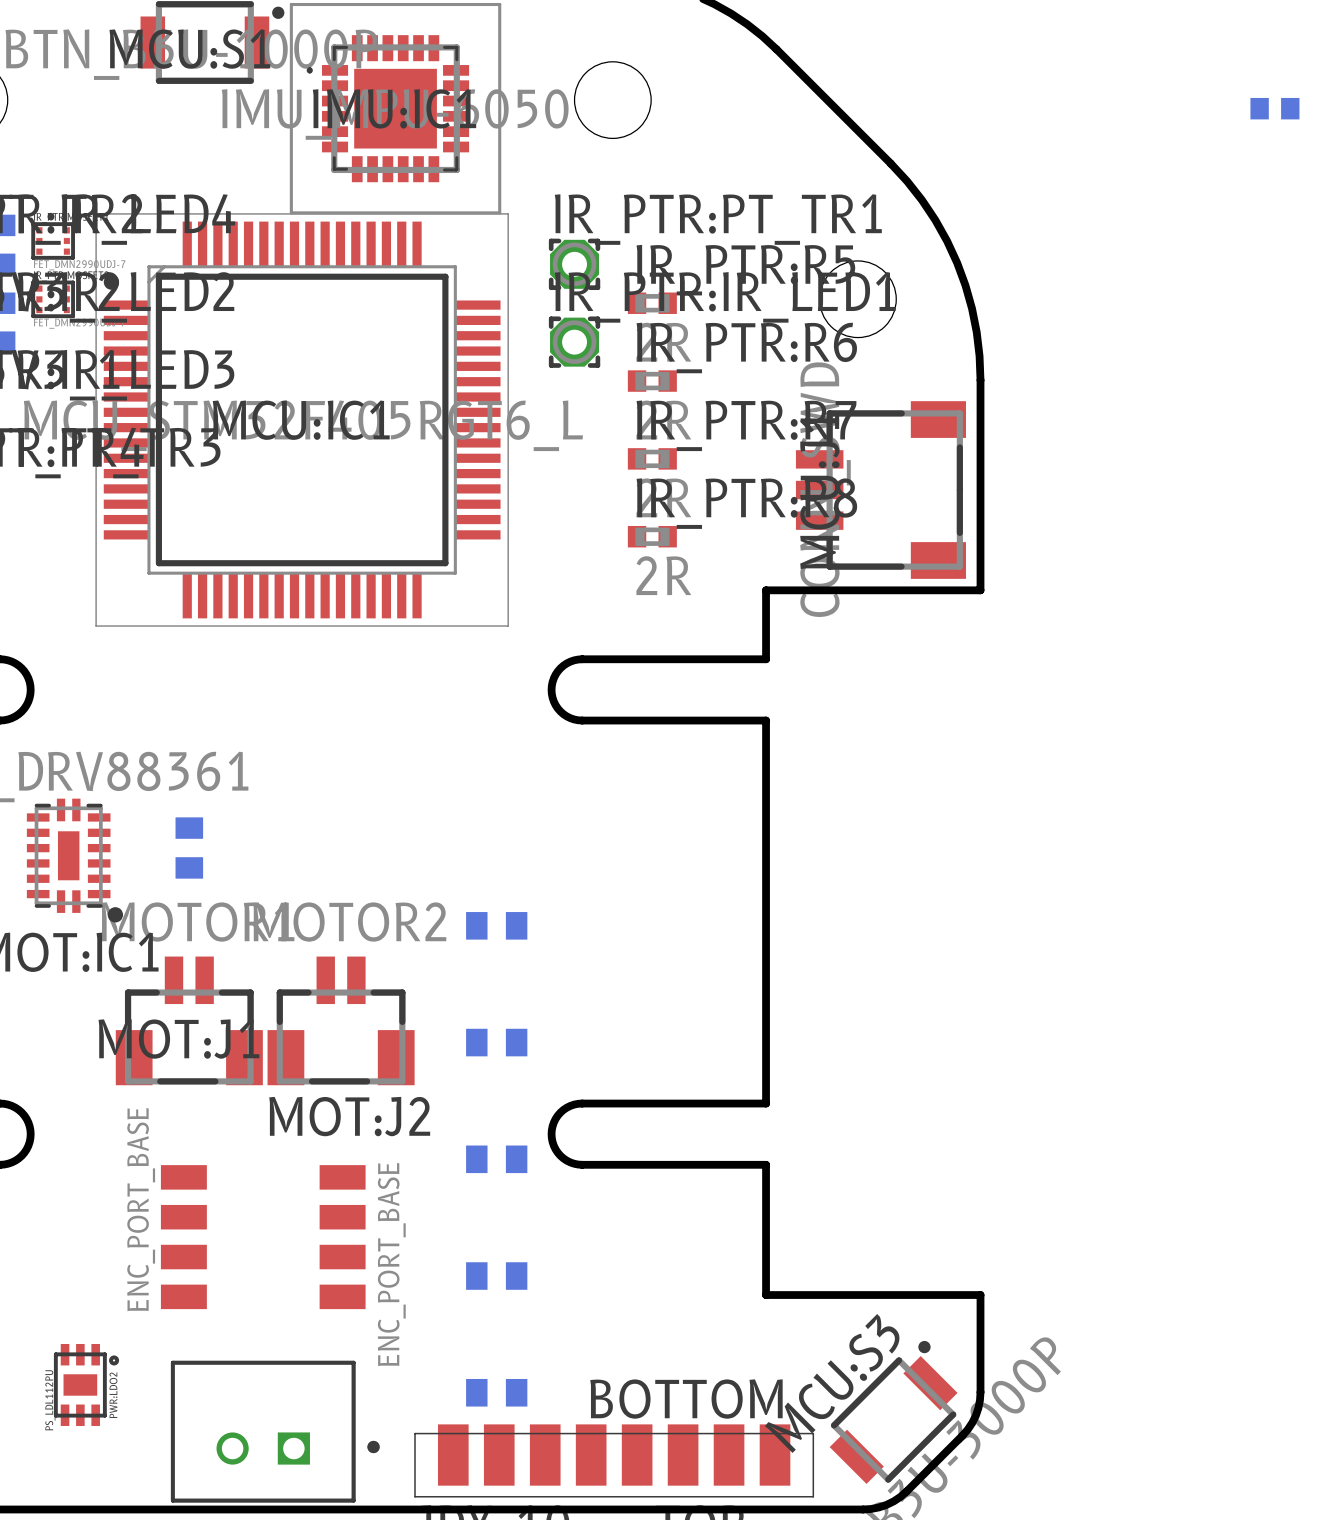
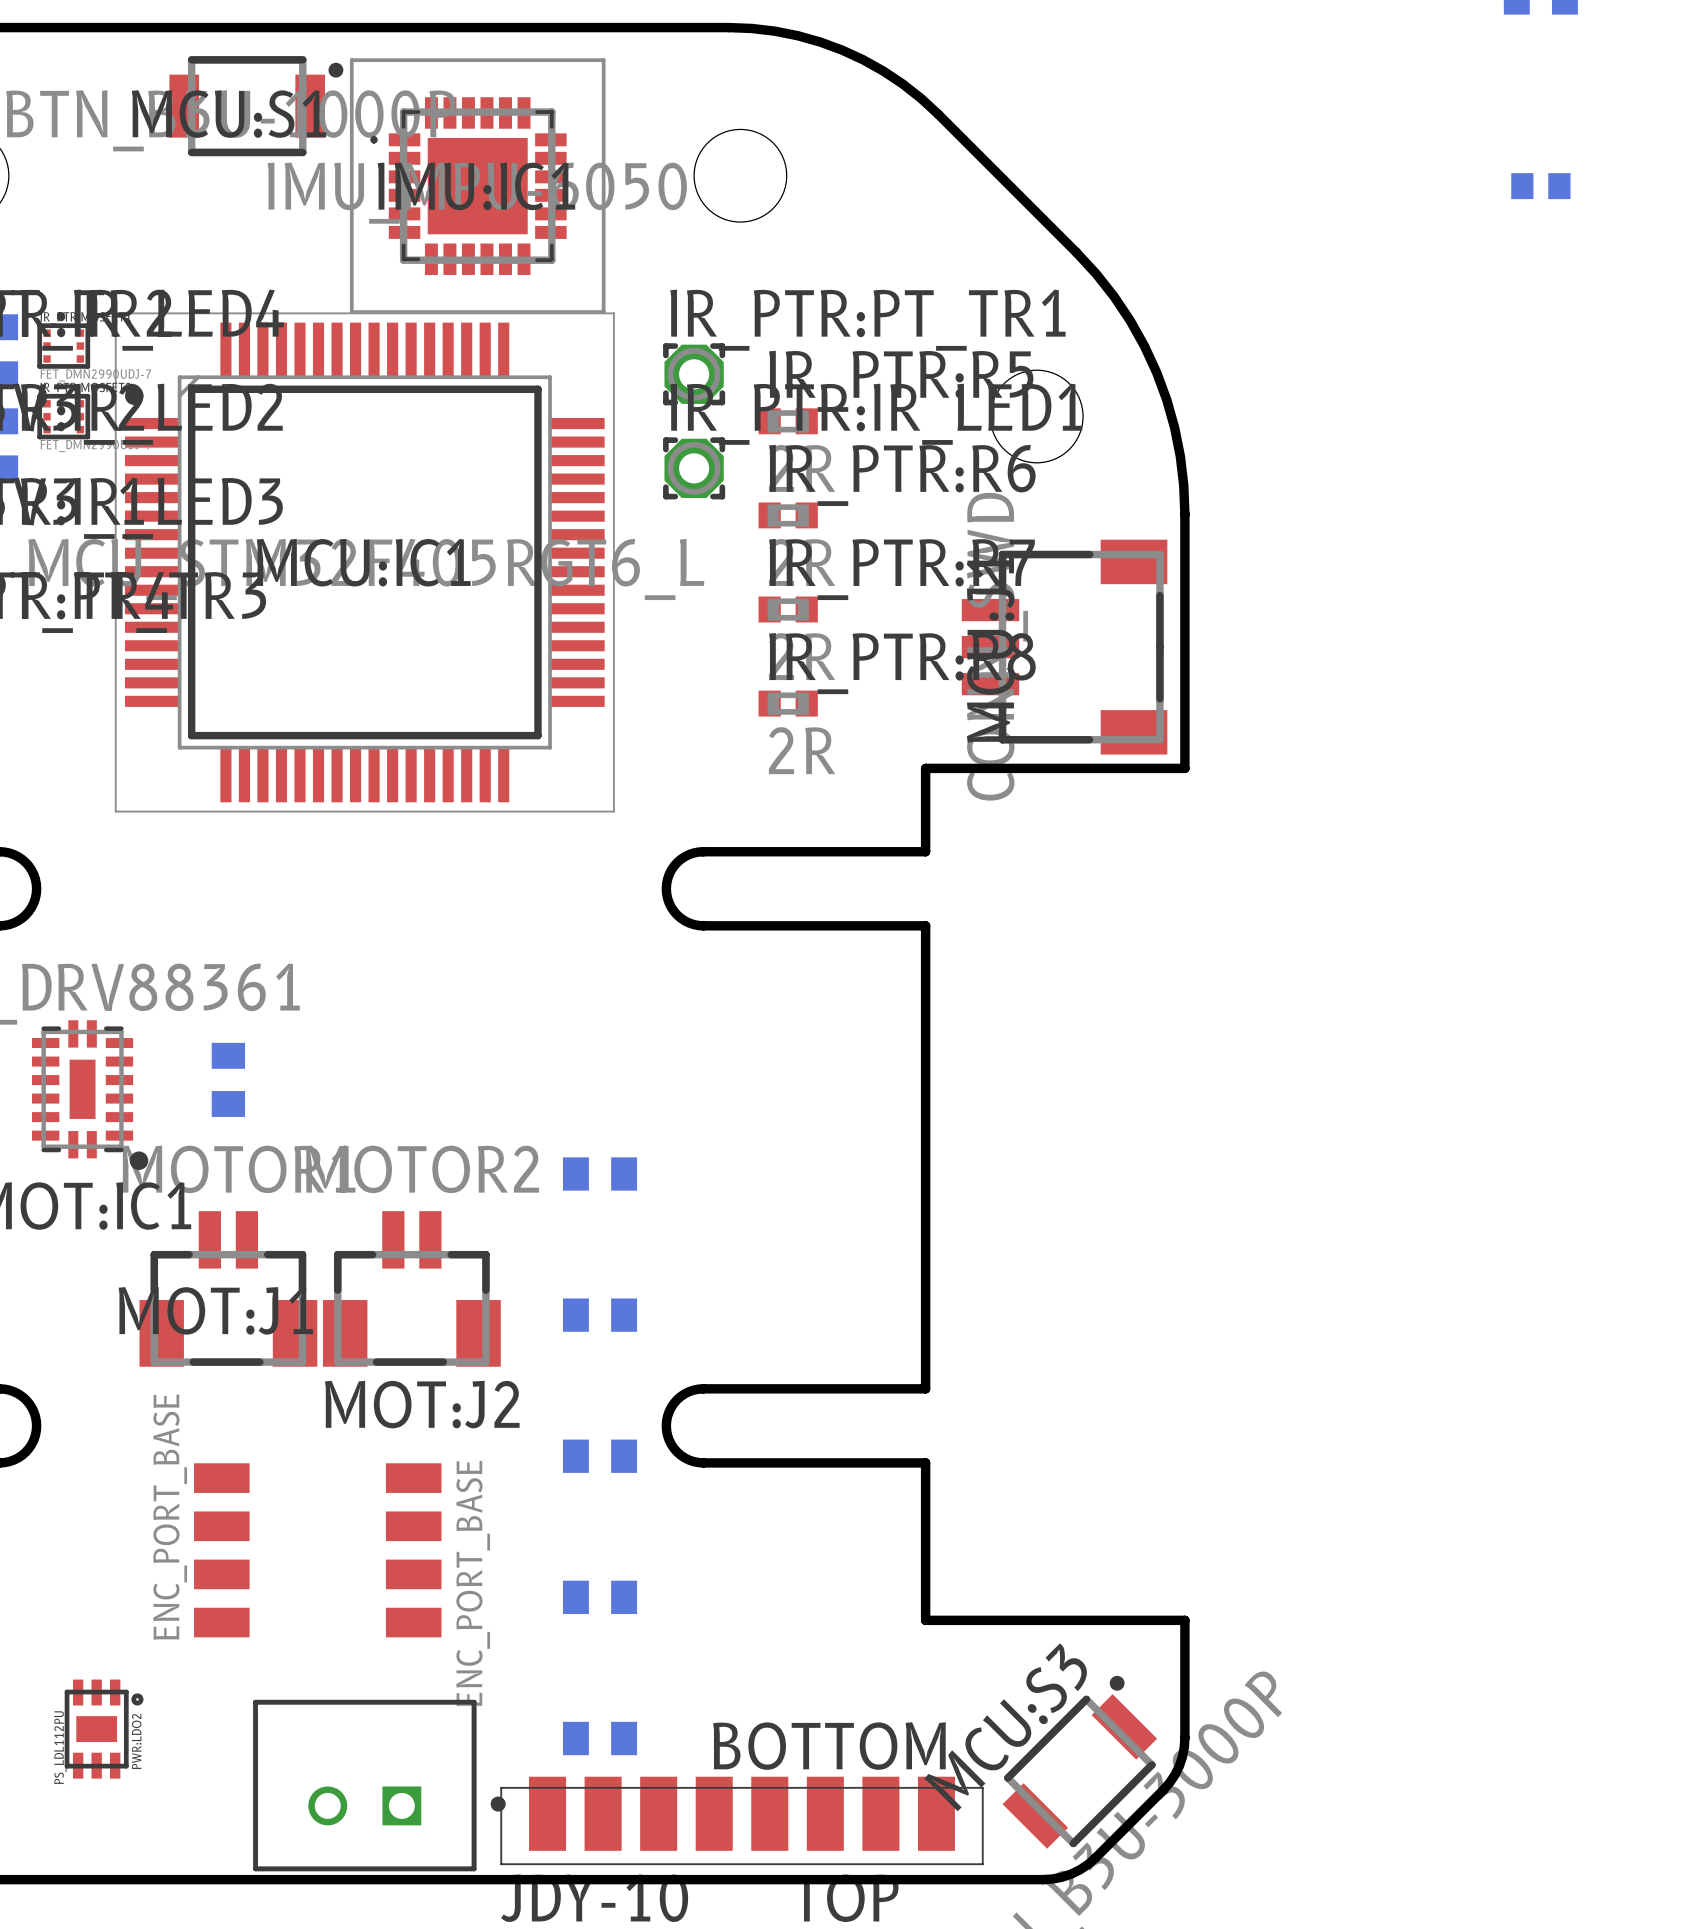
part position: (275, 1431) -> (379, 1785)

